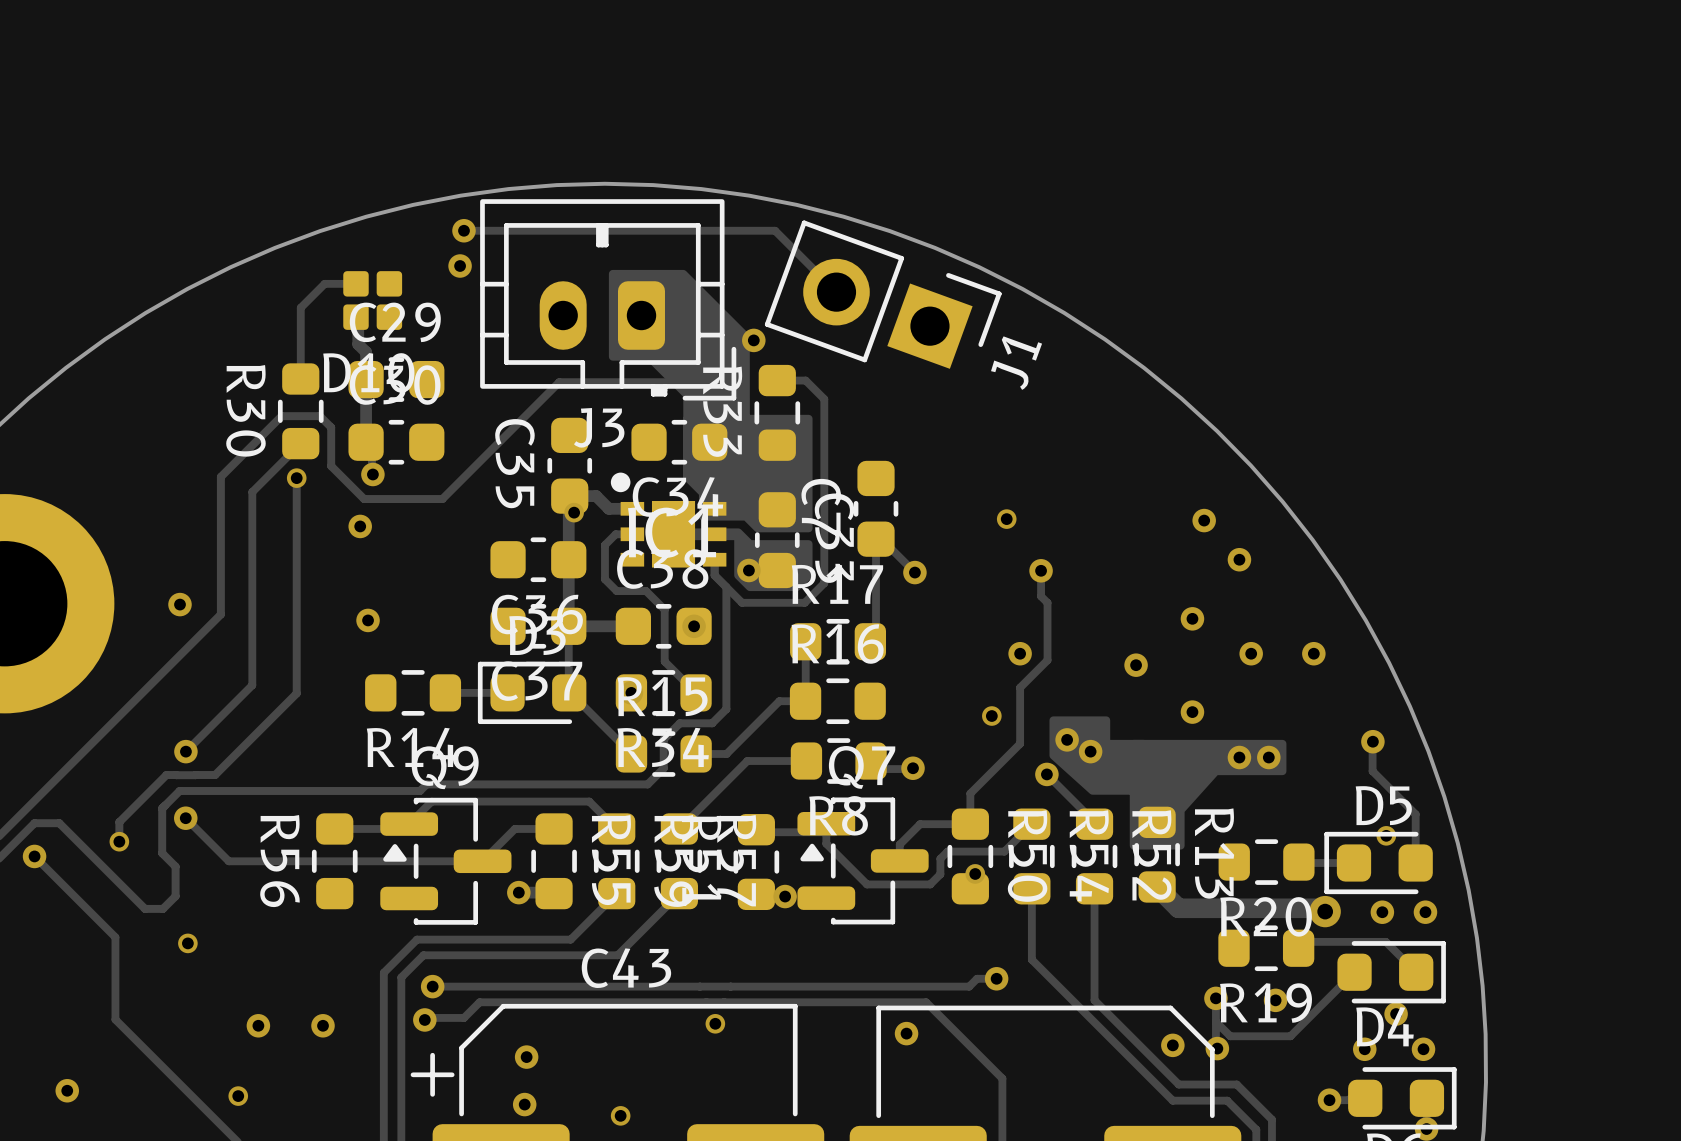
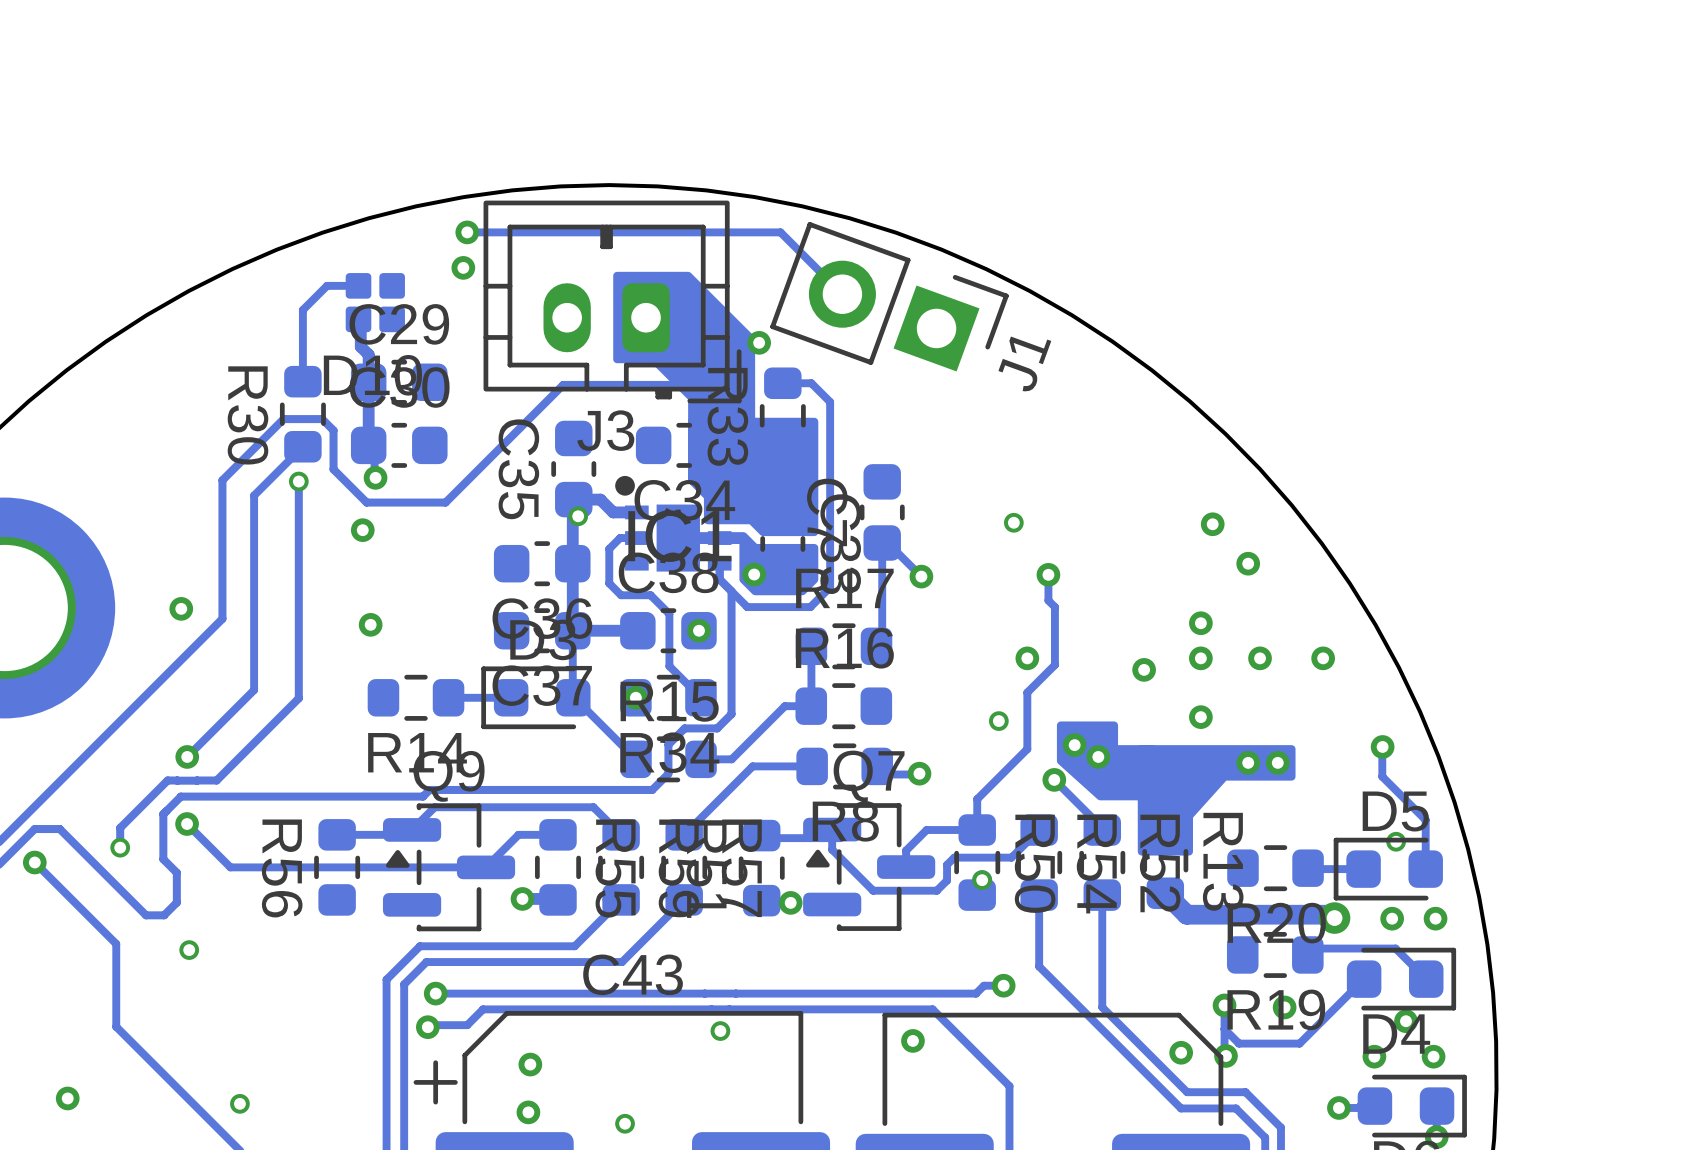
via: none -> (1200, 658)
via: (258, 1025) -> none
via: (323, 1025) -> none

